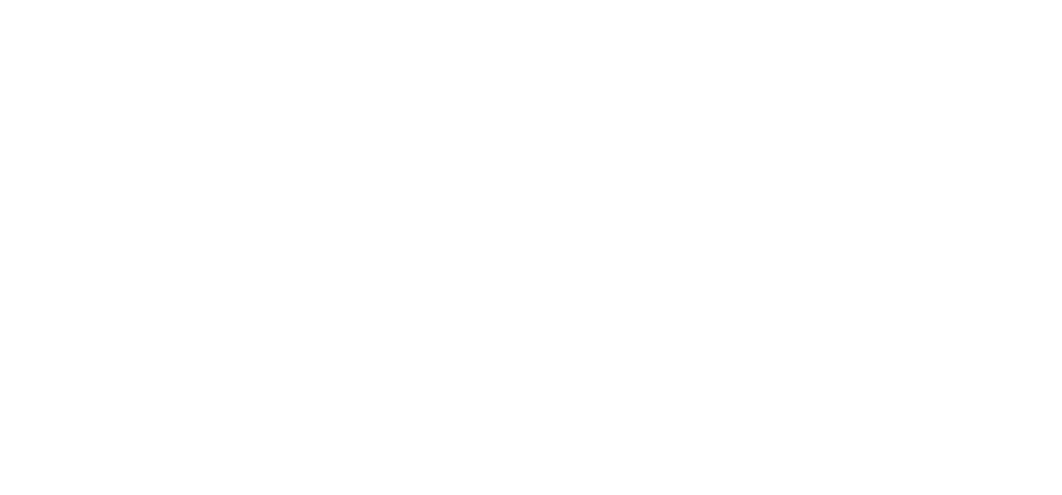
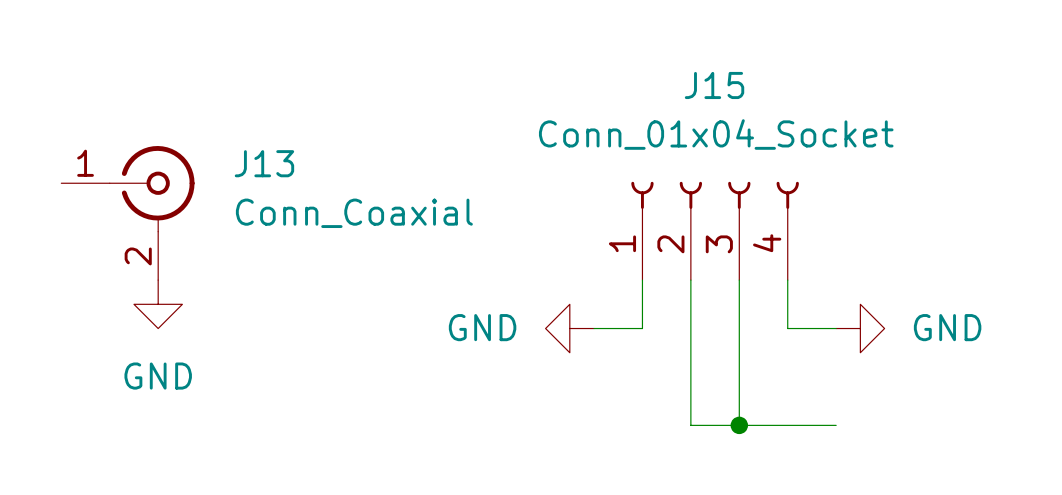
J13: none -> Conn_Coaxial (127, 213)
J15: none -> Conn_01x04_Socket (715, 230)
wire: none -> (642, 280) (642, 328) (594, 328)
wire: none -> (690, 280) (690, 425) (836, 425)
wire: none -> (739, 280) (739, 425)
wire: none -> (787, 280) (787, 328) (836, 328)
power symbol: none -> GND (158, 304)
power symbol: none -> GND (569, 328)
power symbol: none -> GND (860, 328)
junction: none -> (739, 425)

